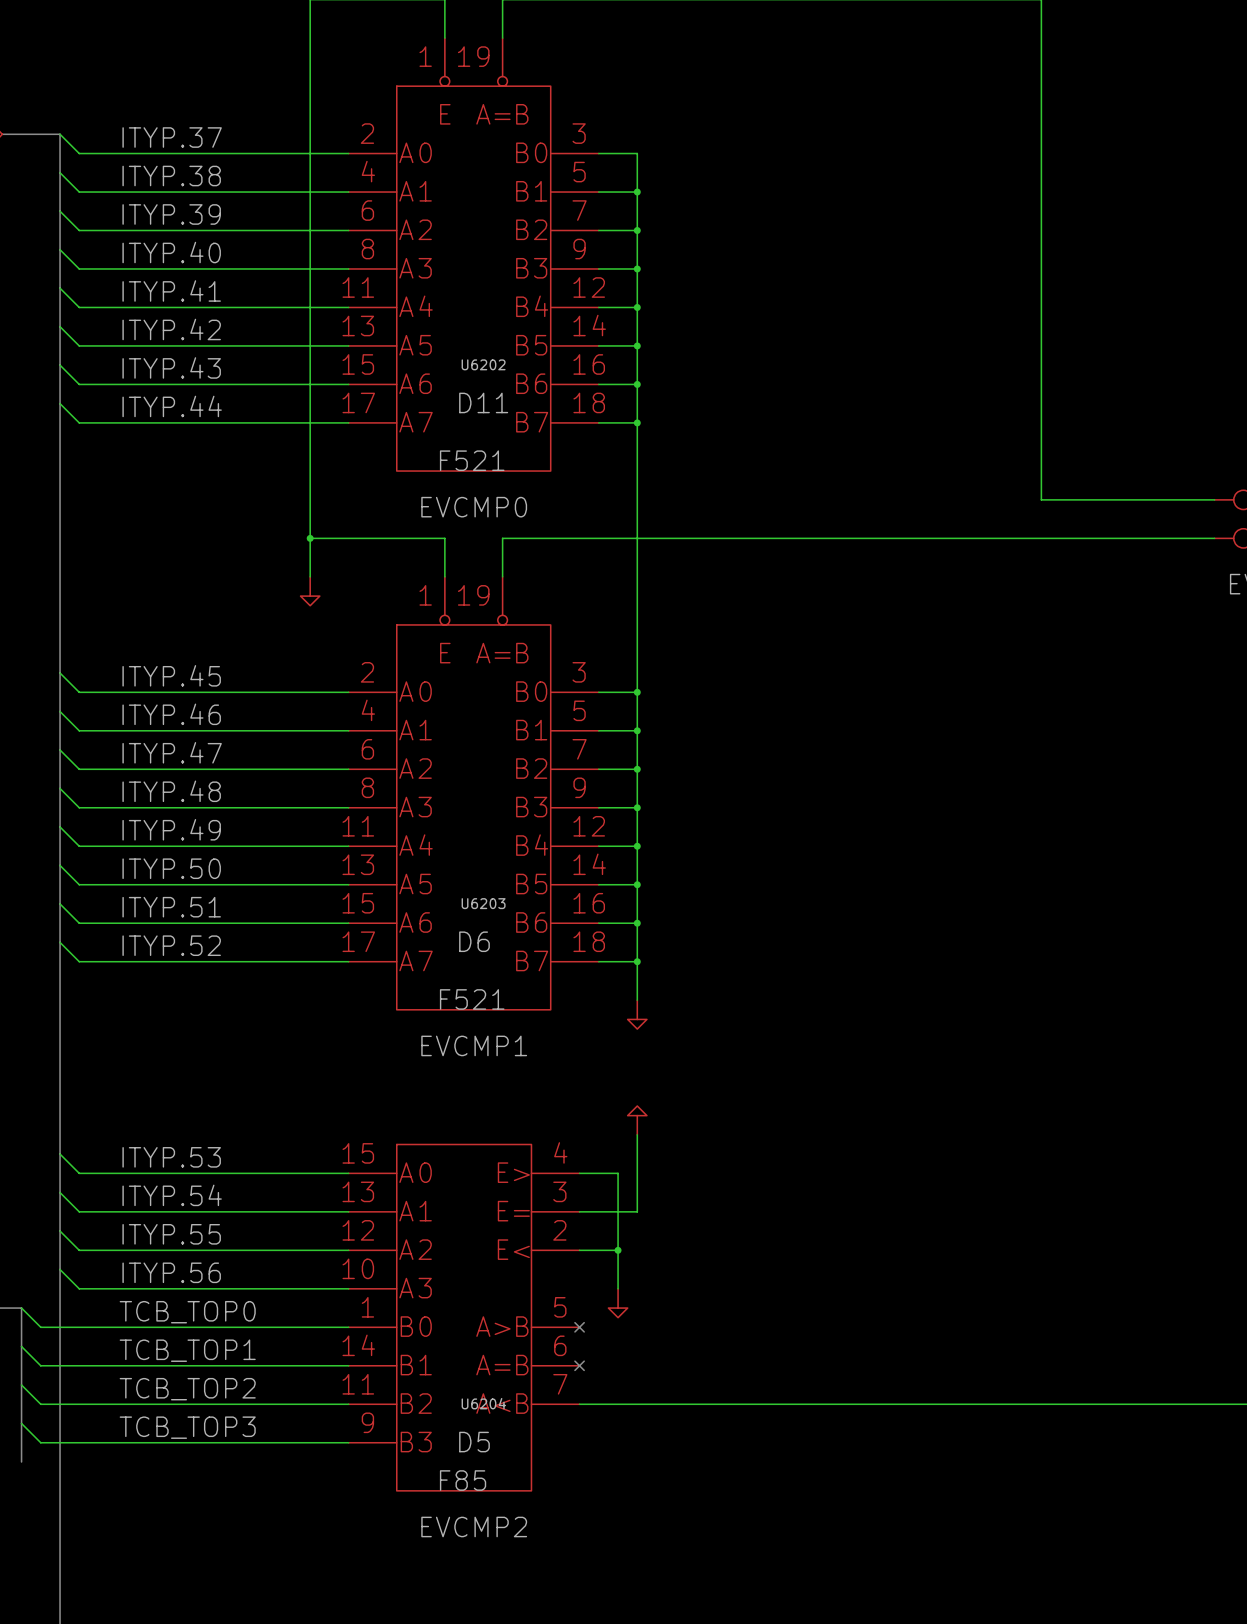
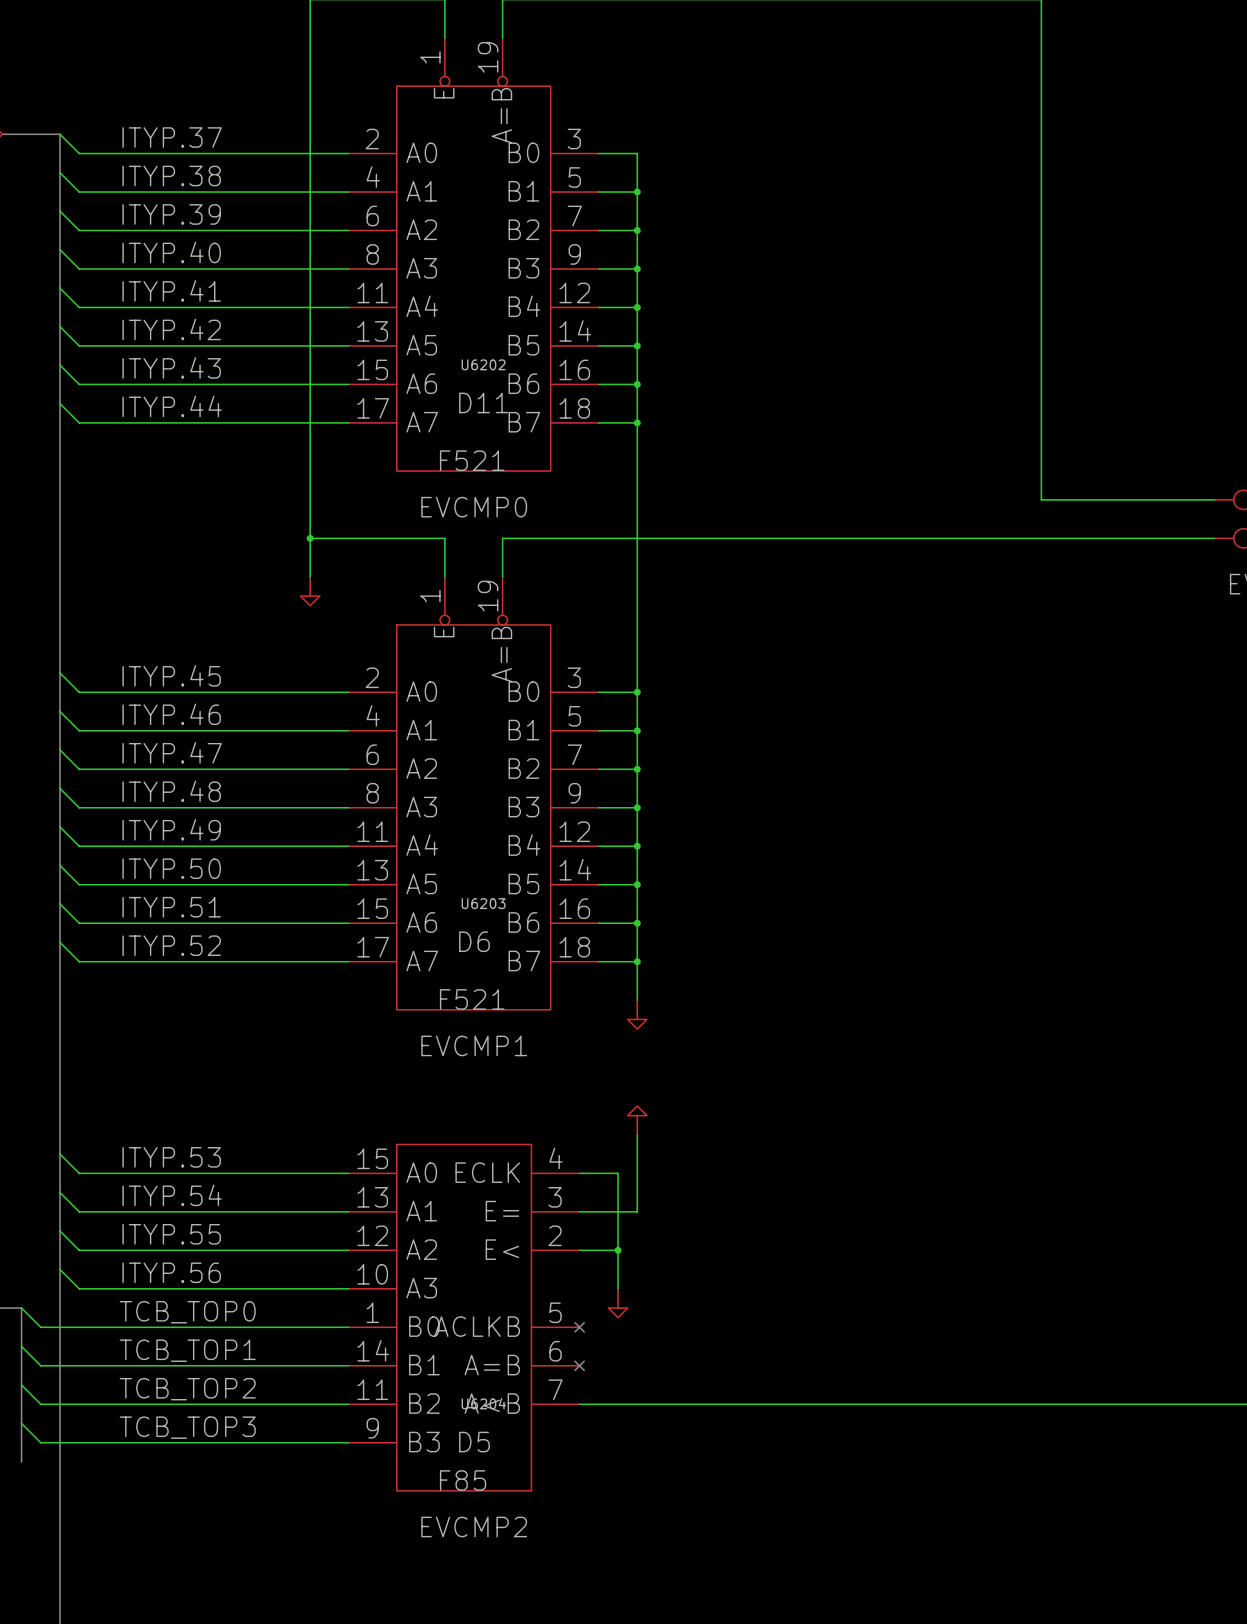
U6202 symbol: [348, 38, 599, 472] -> [348, 38, 599, 472]
U6203 symbol: [348, 576, 599, 1010] -> [348, 576, 599, 1010]
U6204 symbol: [348, 1144, 580, 1491] -> [348, 1144, 580, 1491]

